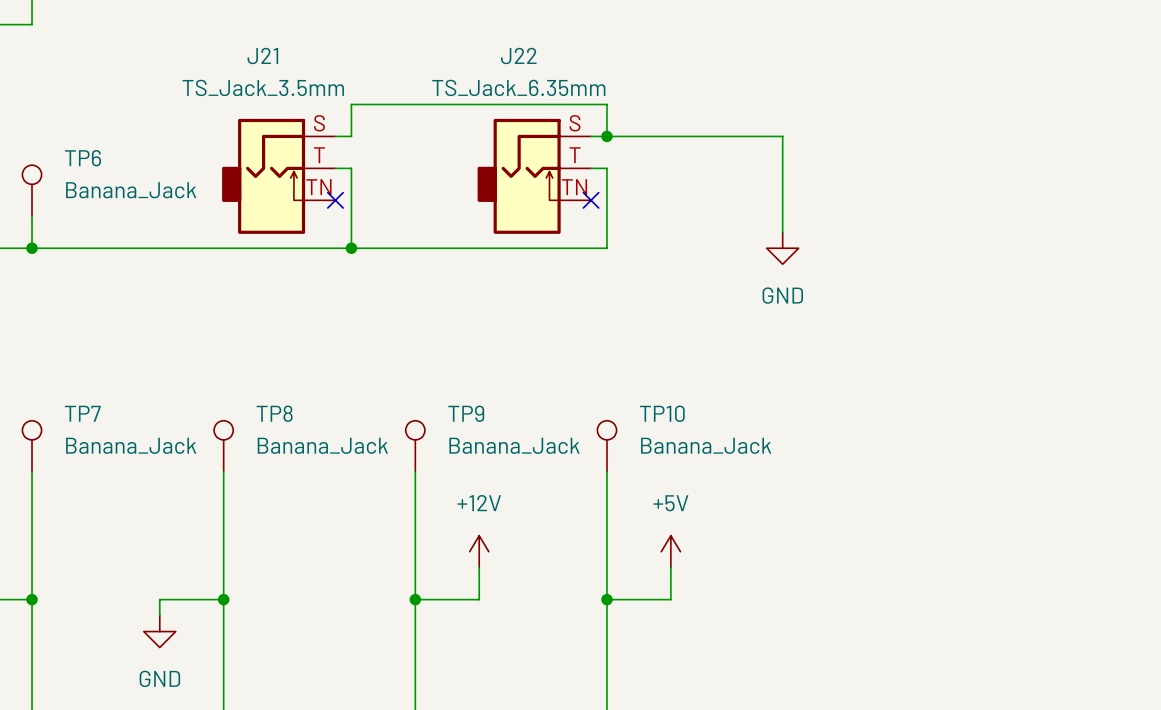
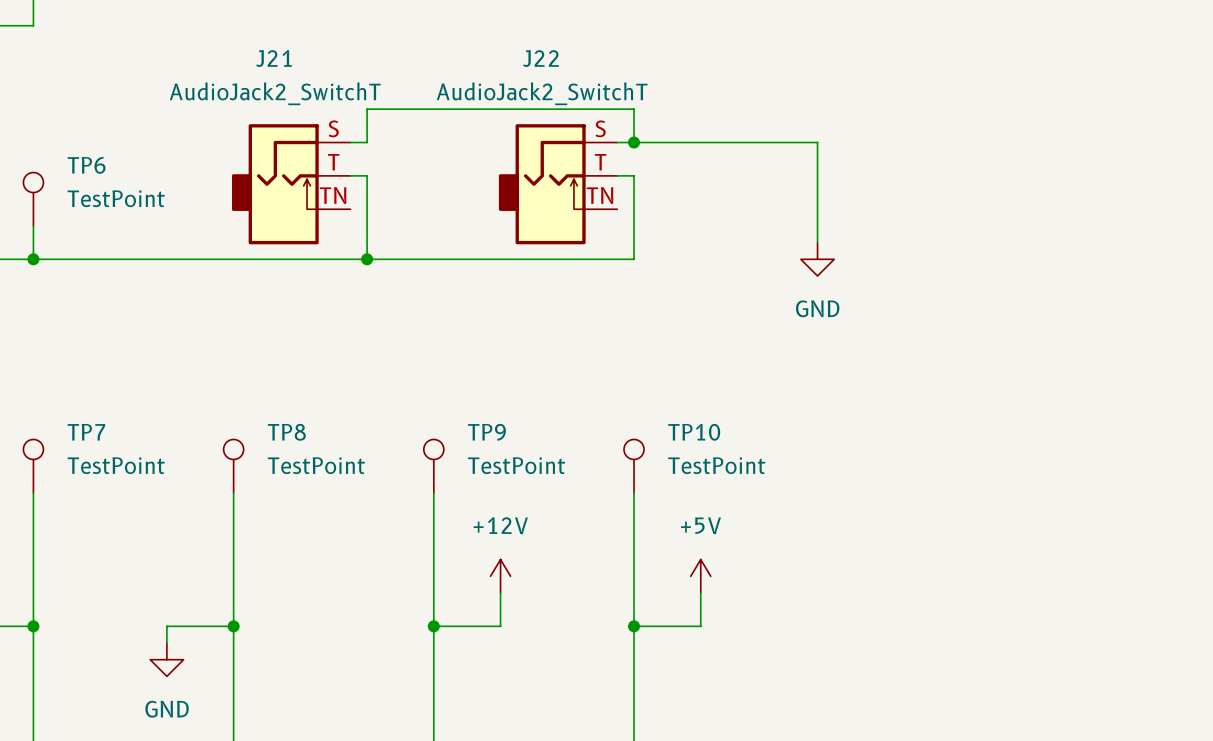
J21 value: TS_Jack_3.5mm (263, 87) -> AudioJack2_SwitchT (275, 93)
J22 value: TS_Jack_6.35mm (518, 87) -> AudioJack2_SwitchT (542, 93)
TP6 value: Banana_Jack (131, 190) -> TestPoint (116, 198)
no-connect mark: (335, 200) -> none
no-connect mark: (591, 200) -> none
TP7 value: Banana_Jack (131, 445) -> TestPoint (116, 465)
TP8 value: Banana_Jack (322, 445) -> TestPoint (316, 465)
TP9 value: Banana_Jack (514, 445) -> TestPoint (516, 465)
TP10 value: Banana_Jack (706, 445) -> TestPoint (716, 465)

